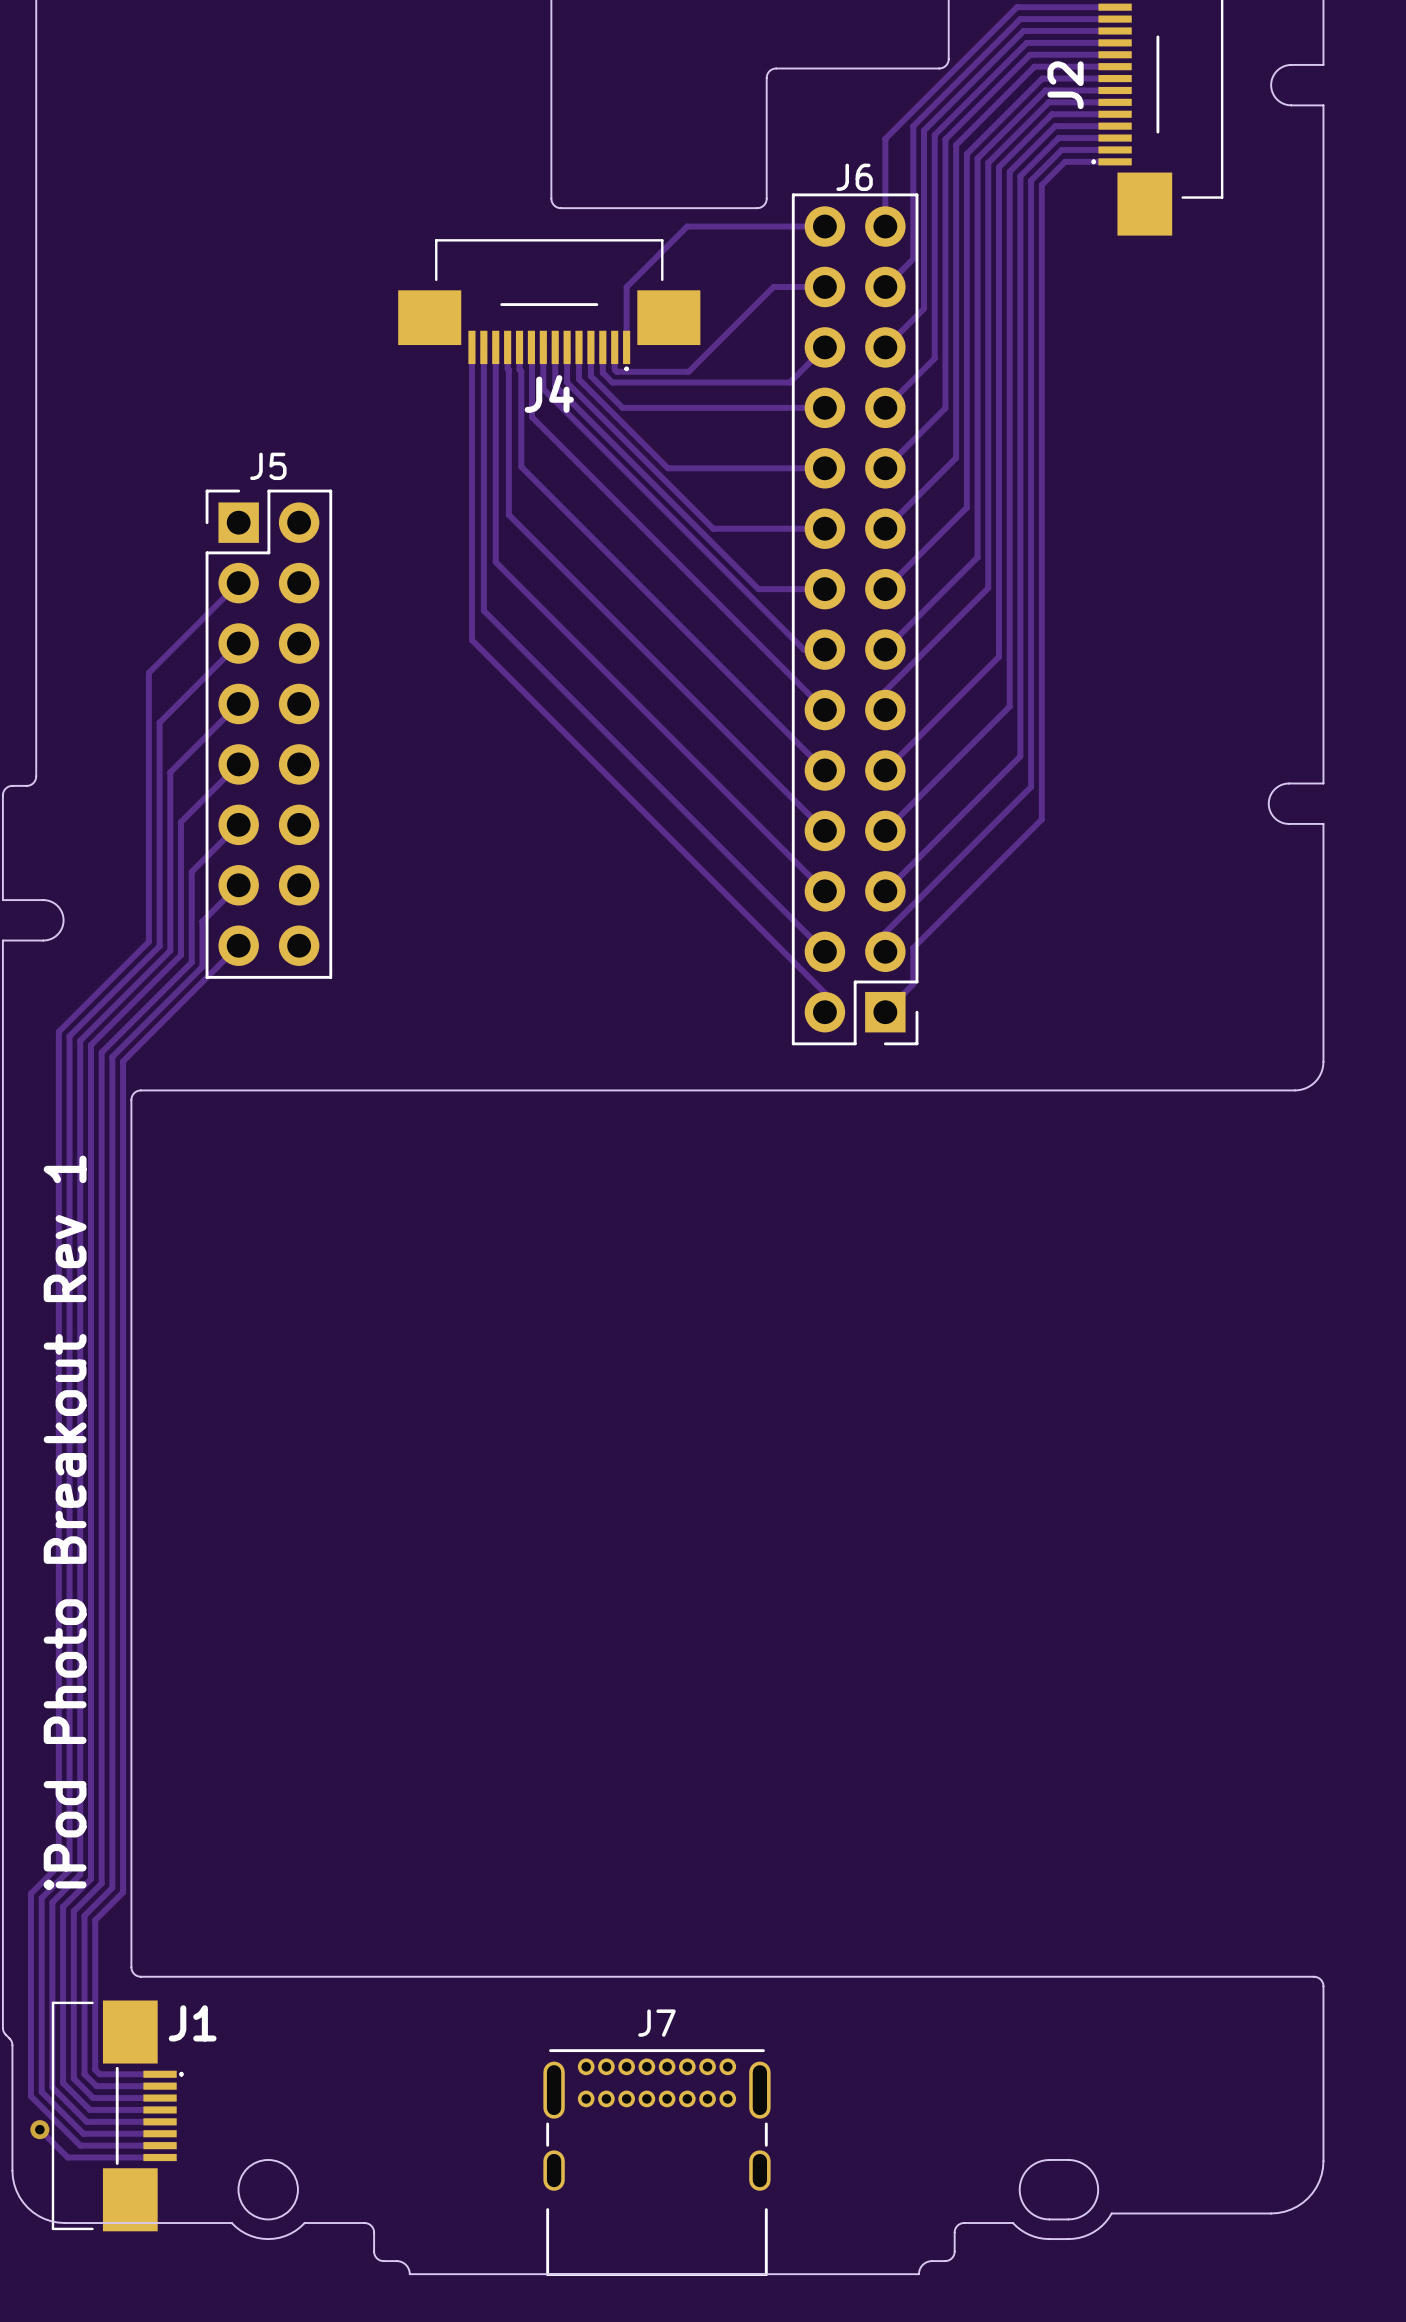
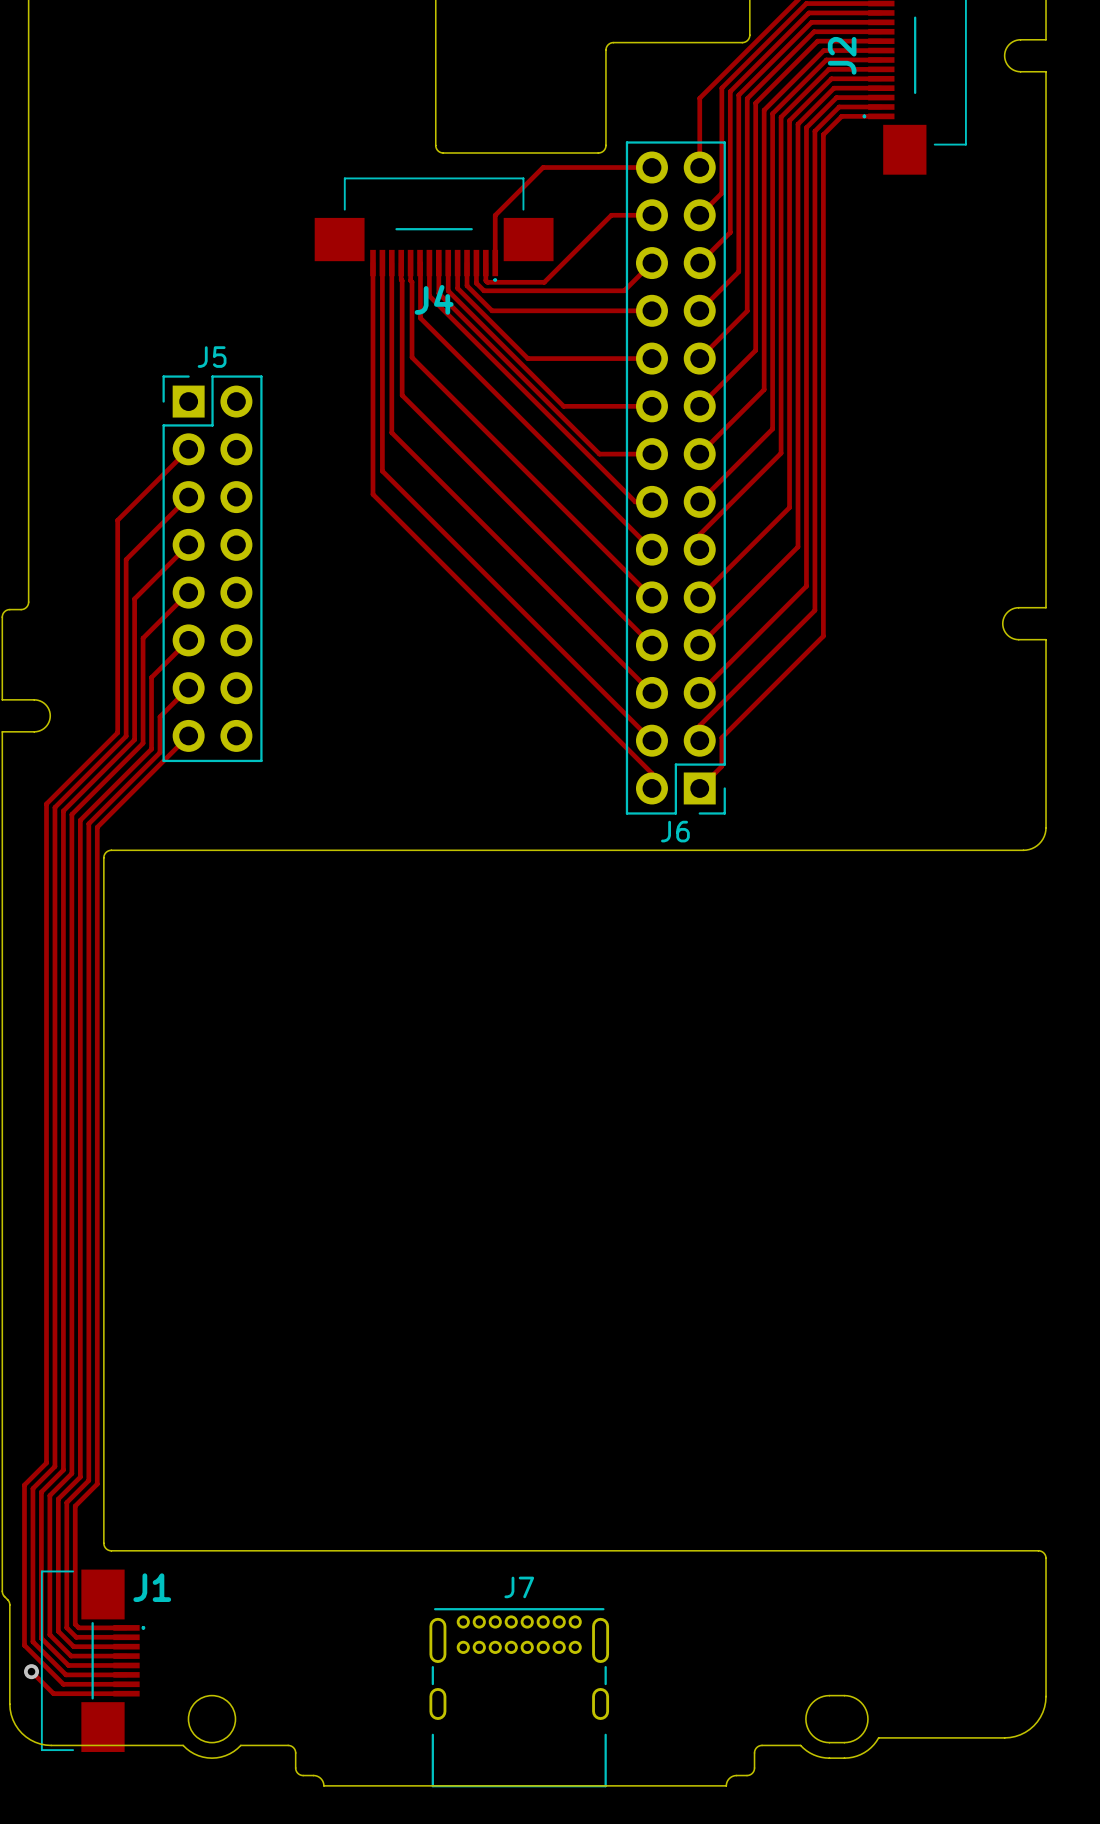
J6 name position: J6 (854, 177) -> J6 (675, 831)
text: iPod Photo Breakout Rev 1 (65, 1522) -> none

